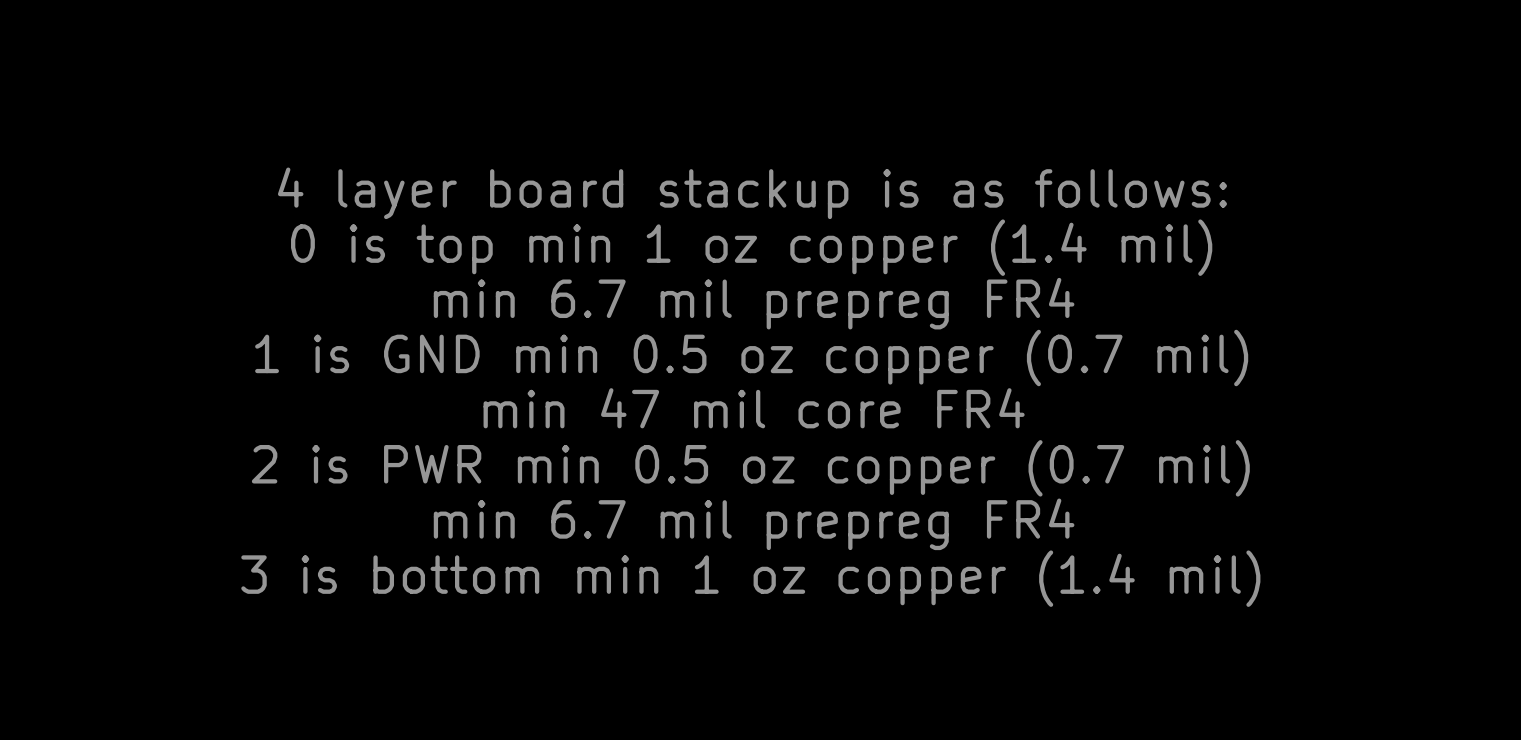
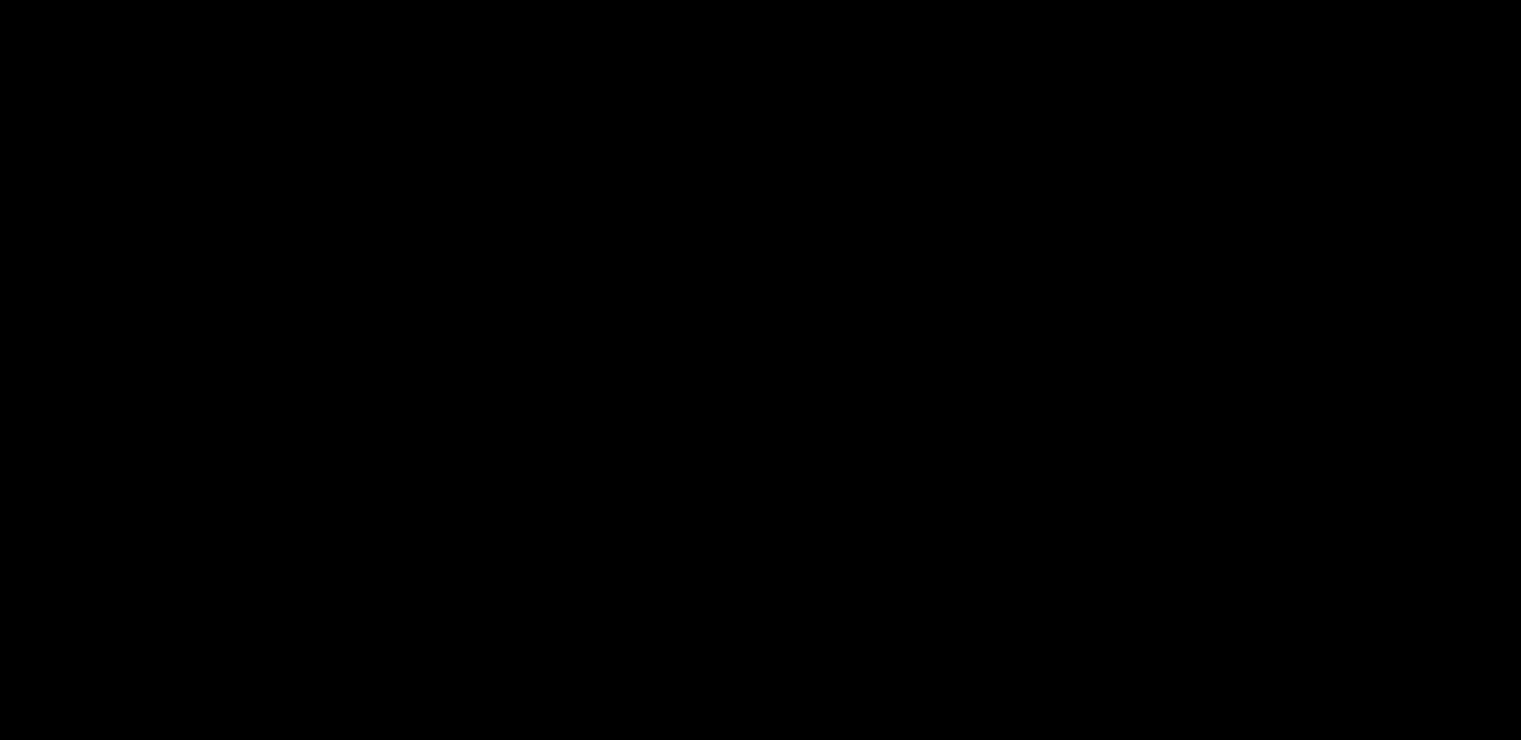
text: 4 layer board stackup is as follows: (752, 193) -> none
text: 0 is top min 1 oz copper (1.4 mil) (751, 247) -> none
text: min 6.7 mil prepreg FR4 (754, 303) -> none
text: 1 is GND min 0.5 oz copper (0.7 mil) (751, 358) -> none
text: min 47 mil core FR4 (754, 408) -> none
text: 2 is PWR min 0.5 oz copper (0.7 mil) (750, 468) -> none
text: min 6.7 mil prepreg FR4 (754, 524) -> none
text: 3 is bottom min 1 oz copper (1.4 mil) (750, 578) -> none

